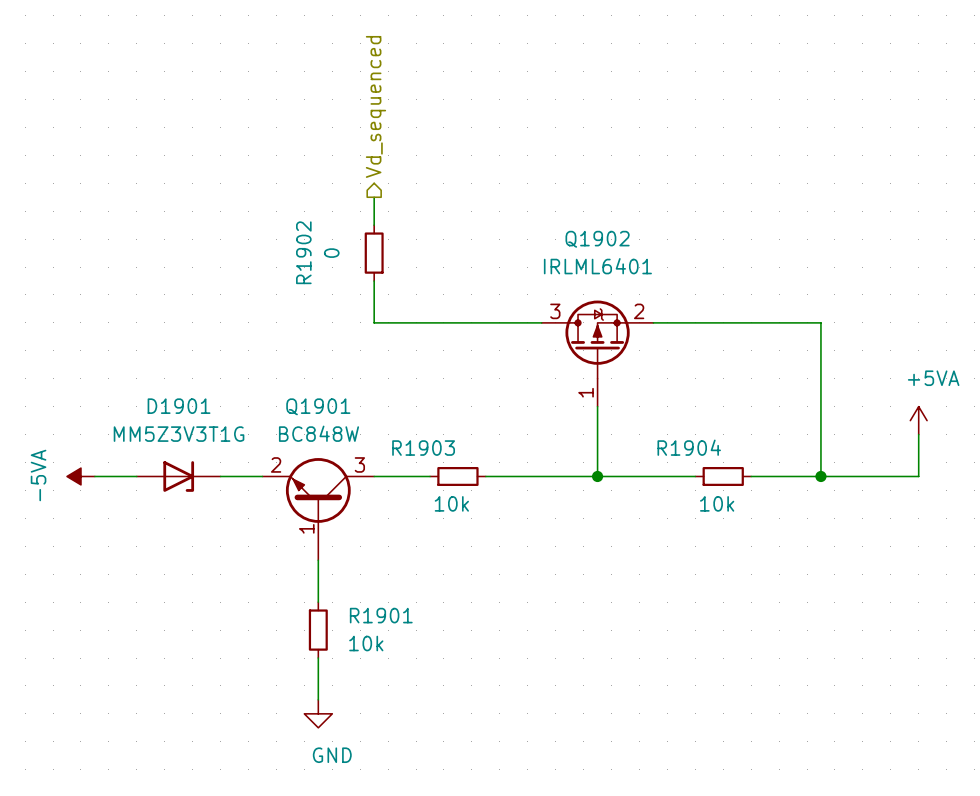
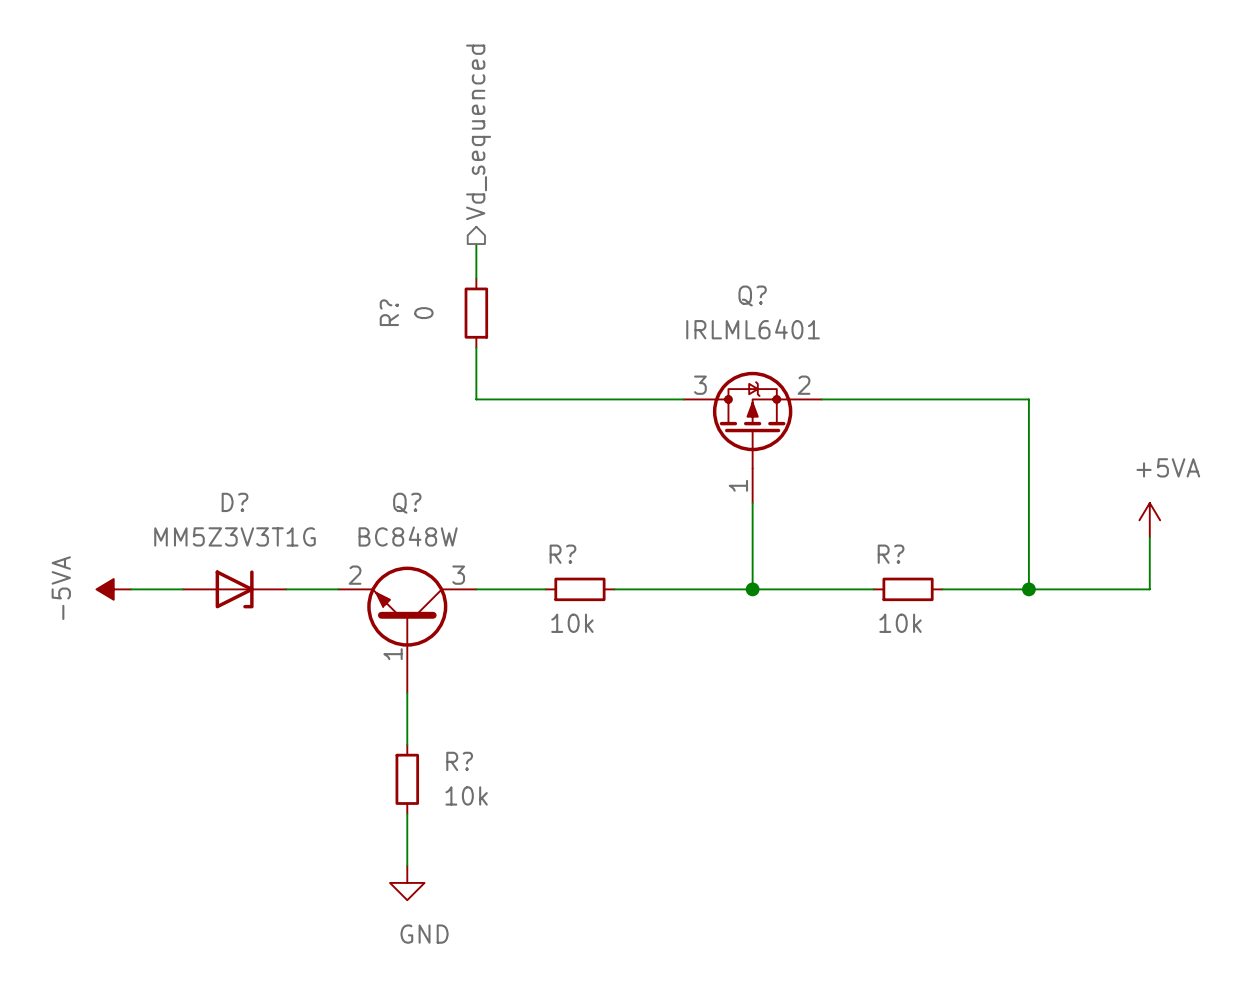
Q1902 name: Q1902 (597, 239) -> Q? (752, 296)
R1902 name: R1902 (303, 252) -> R? (389, 312)
D1901 name: D1901 (179, 406) -> D? (235, 502)
Q1901 name: Q1901 (318, 406) -> Q? (407, 503)
R1904 name: R1904 (689, 447) -> R? (891, 554)
R1903 name: R1903 (423, 448) -> R? (562, 554)
R1901 name: R1901 (381, 615) -> R? (459, 761)

